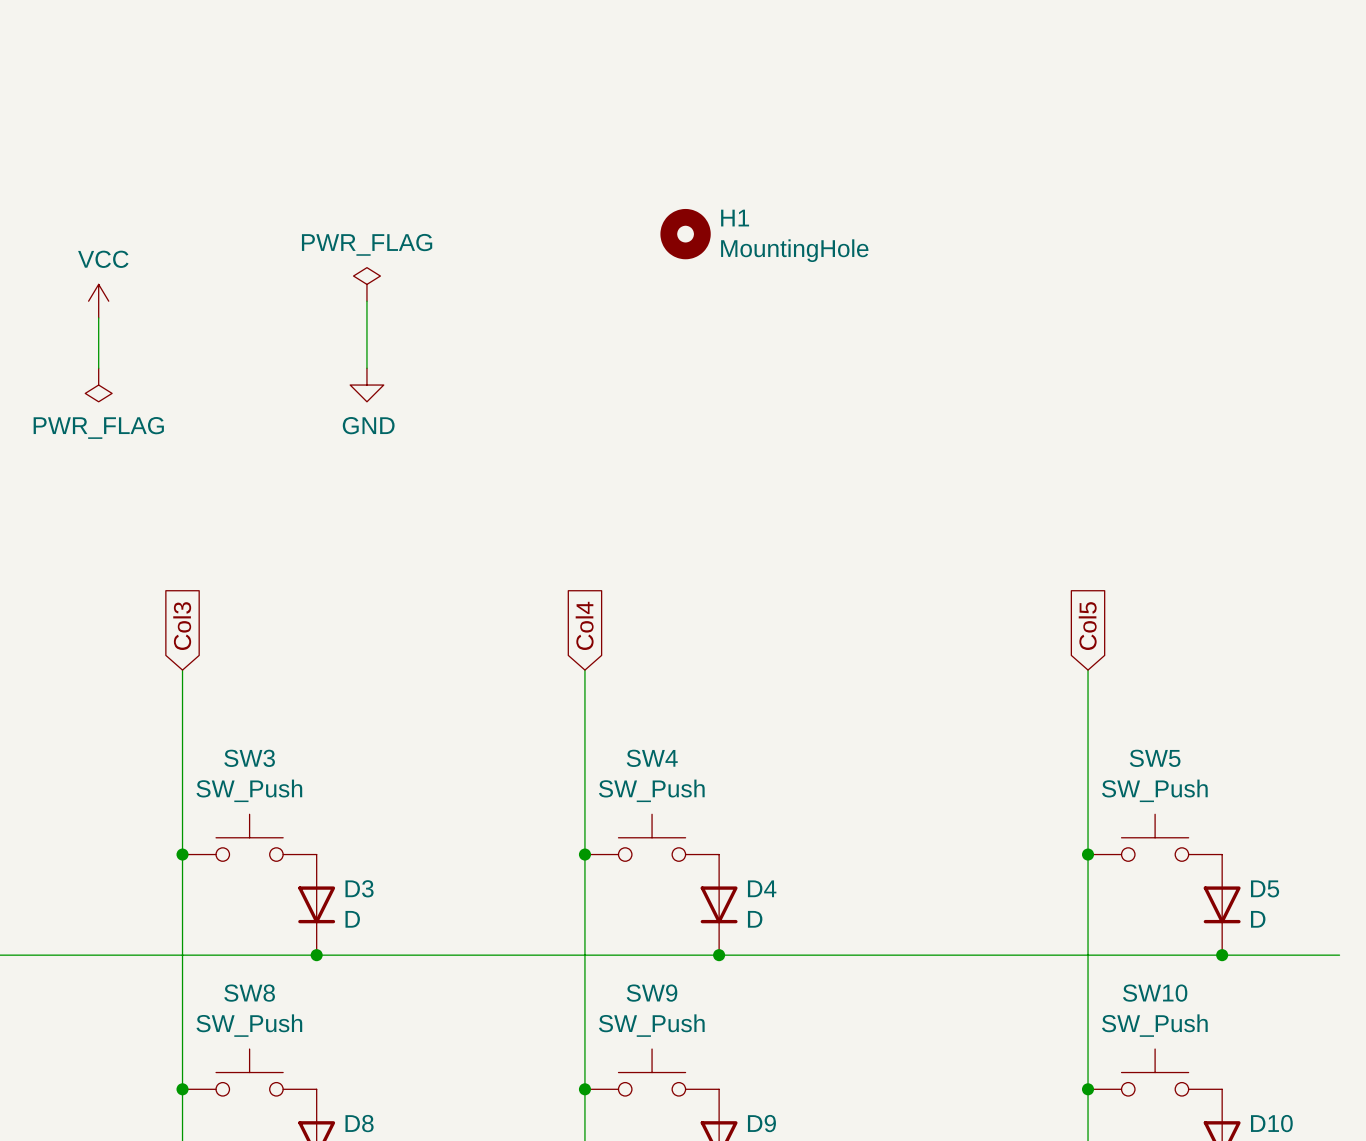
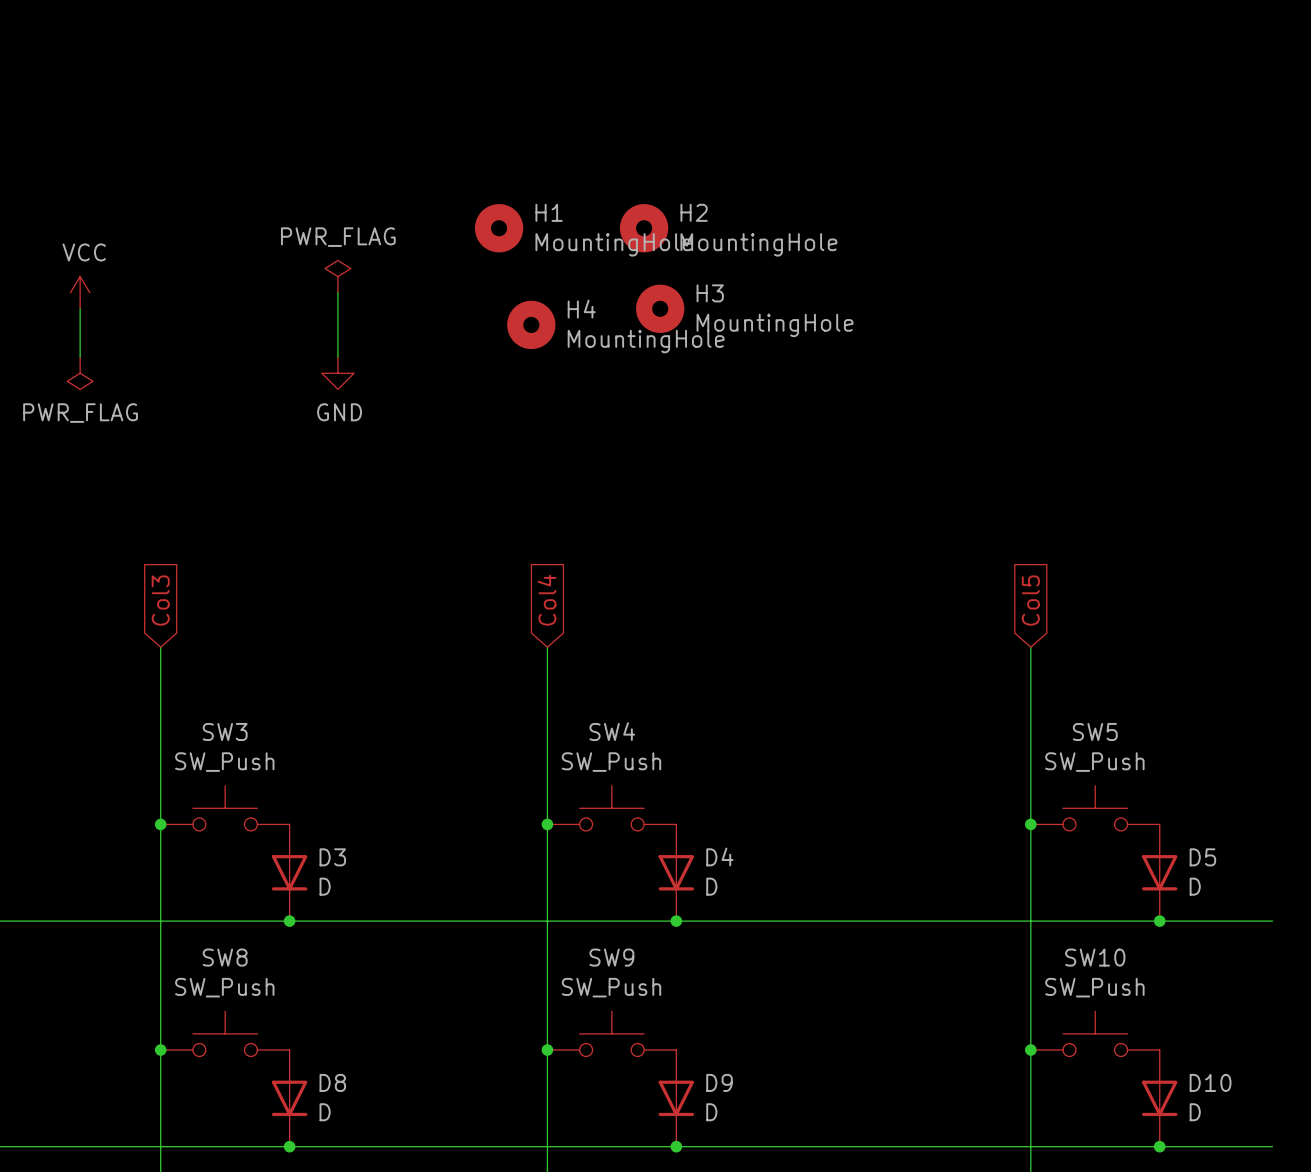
H1 name: H1 (735, 218) -> H2 (694, 212)
H1: none -> MountingHole (499, 228)
H3: none -> MountingHole (660, 308)
H4: none -> MountingHole (531, 324)

